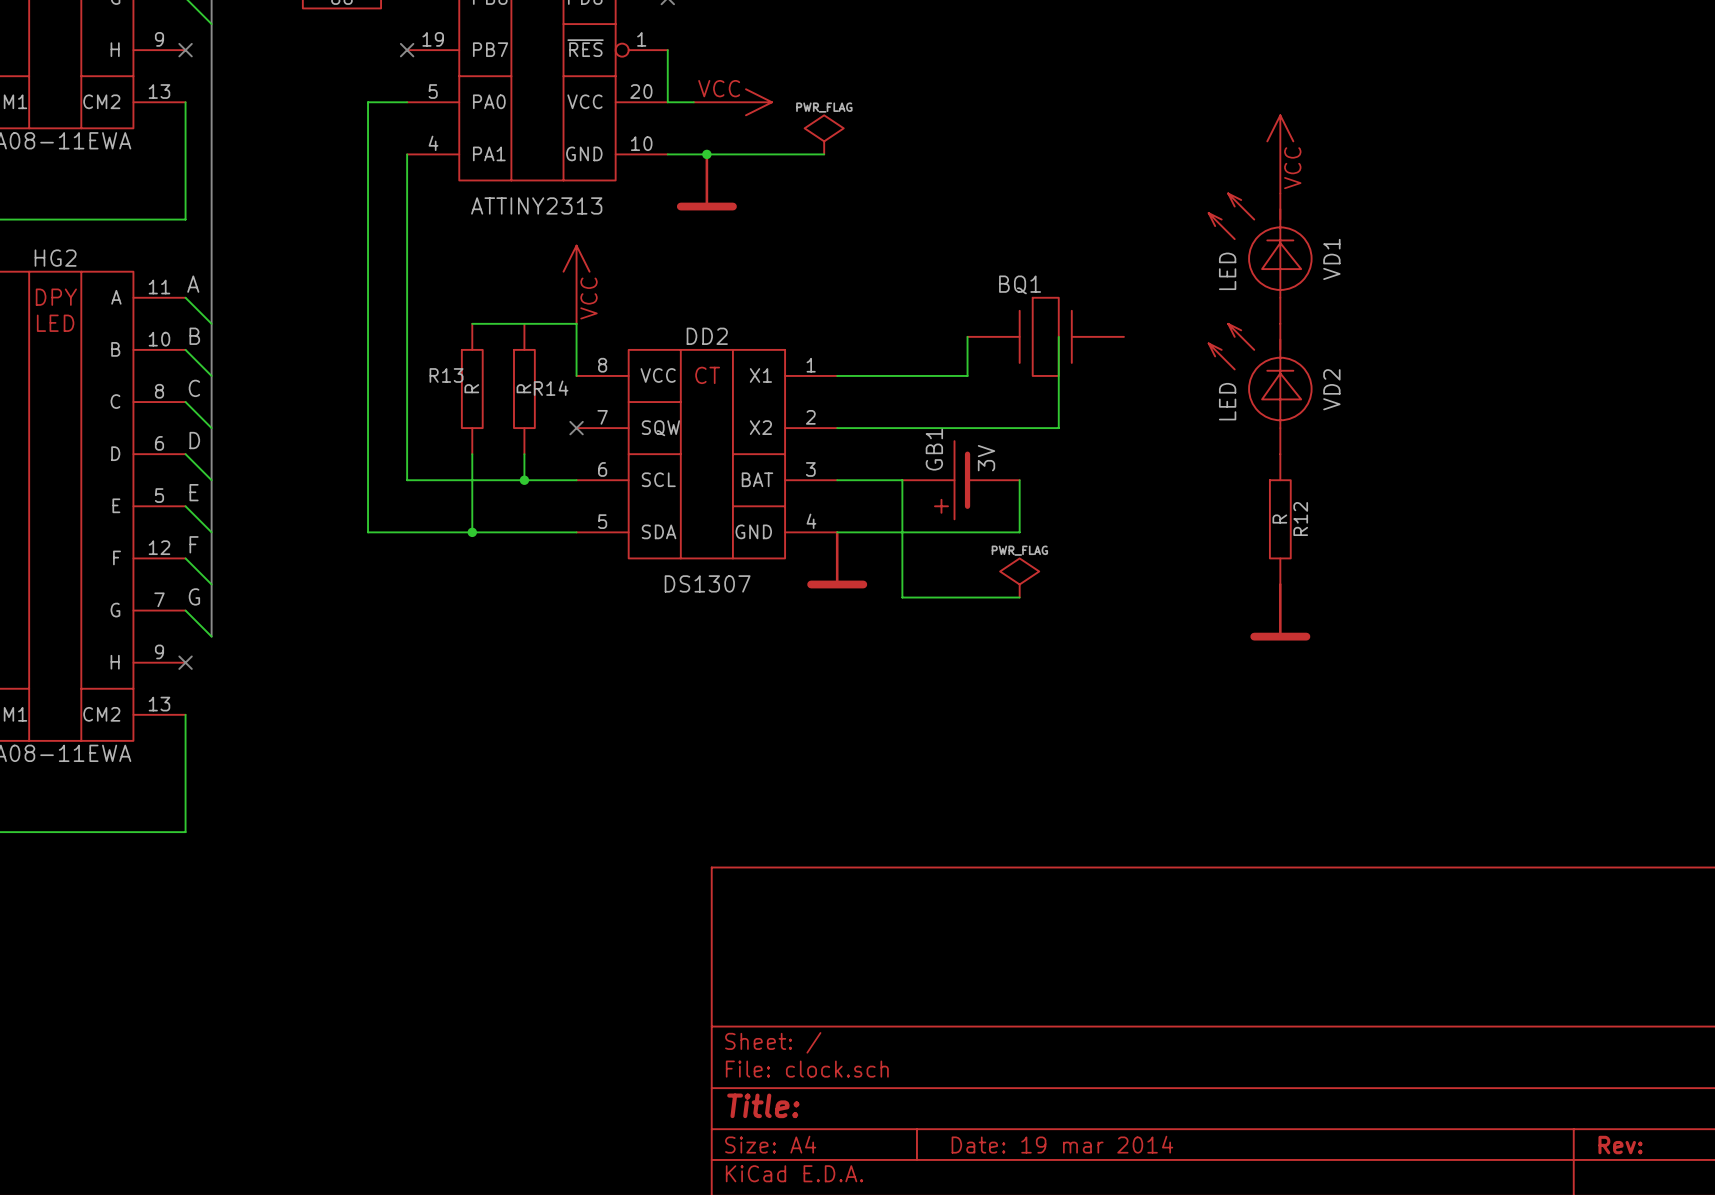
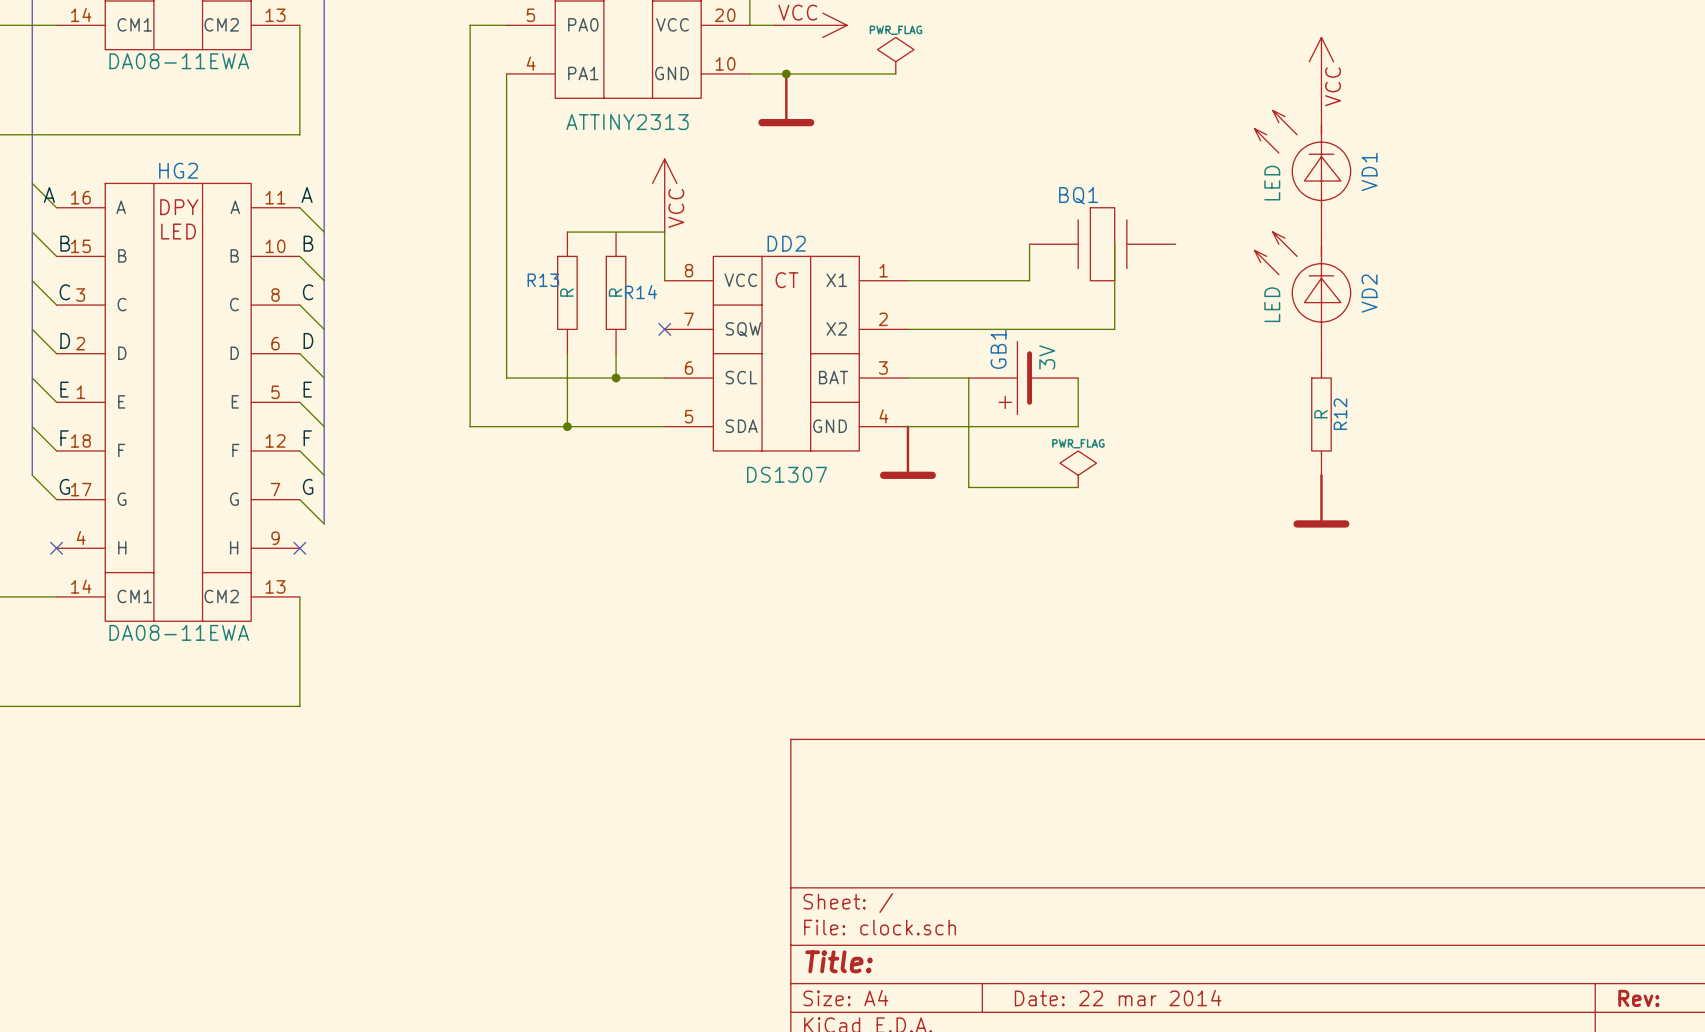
title block: Date: 19 mar 2014 (1062, 1144) -> Date: 22 mar 2014 (1118, 998)

